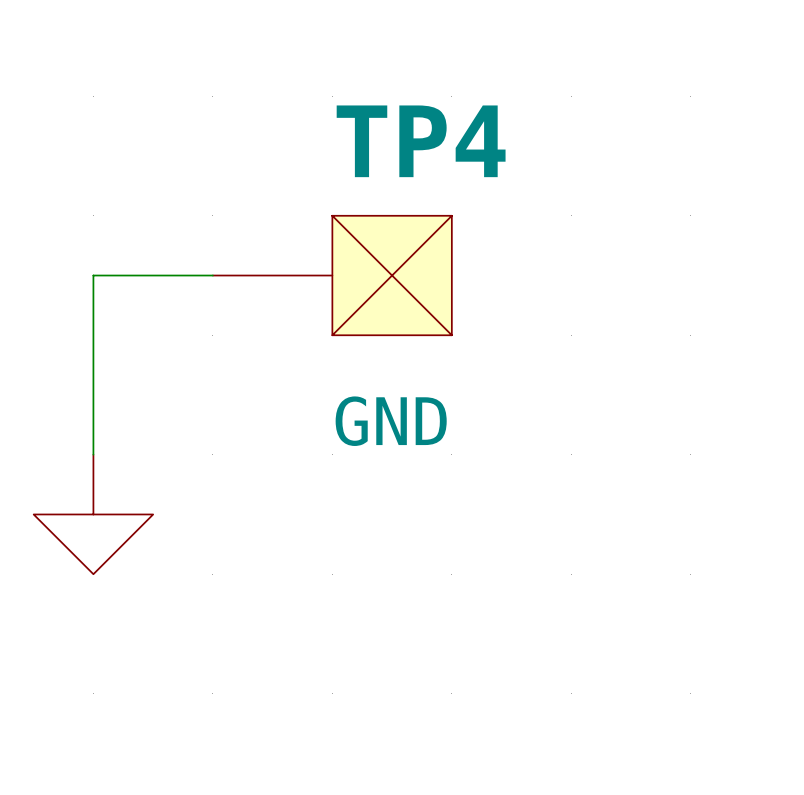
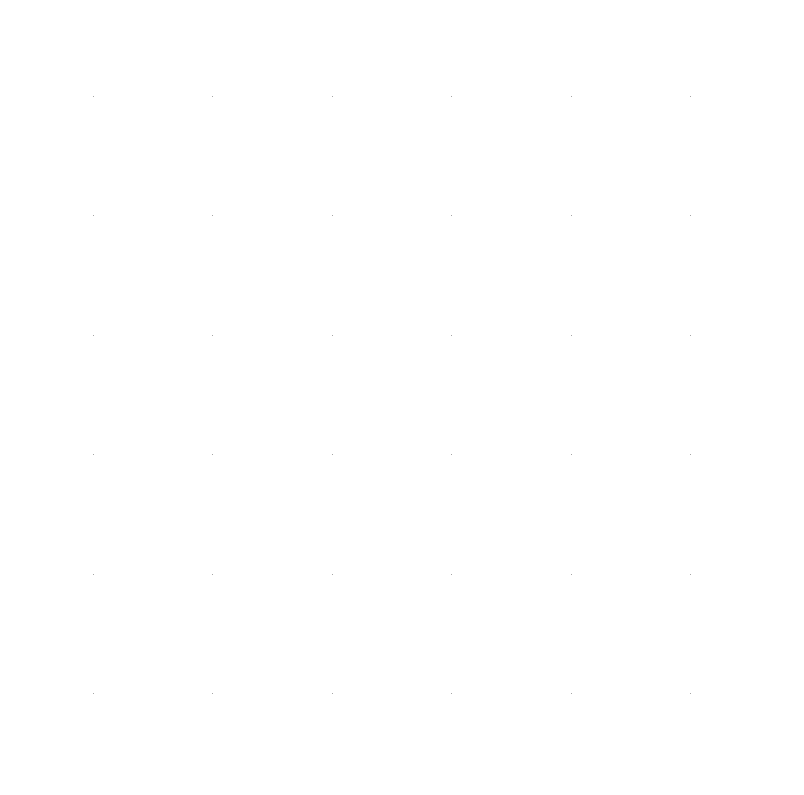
wire: (212, 275) (93, 275) (93, 454) -> none
TP4: GND (332, 275) -> none
power symbol: (93, 514) -> none

